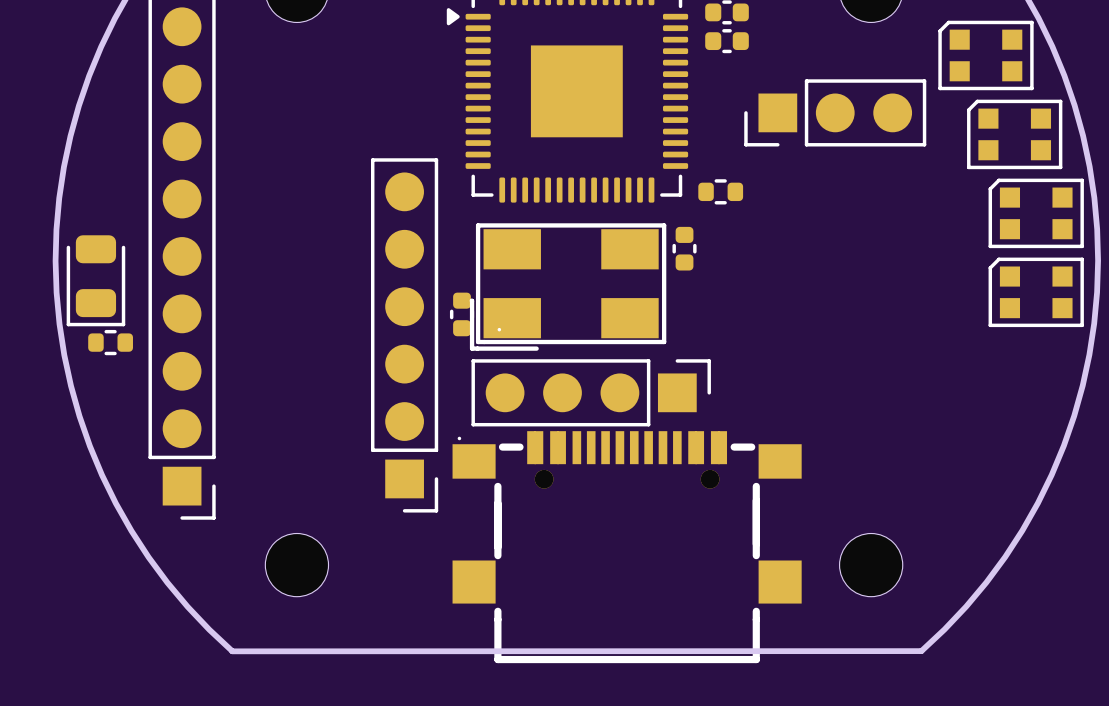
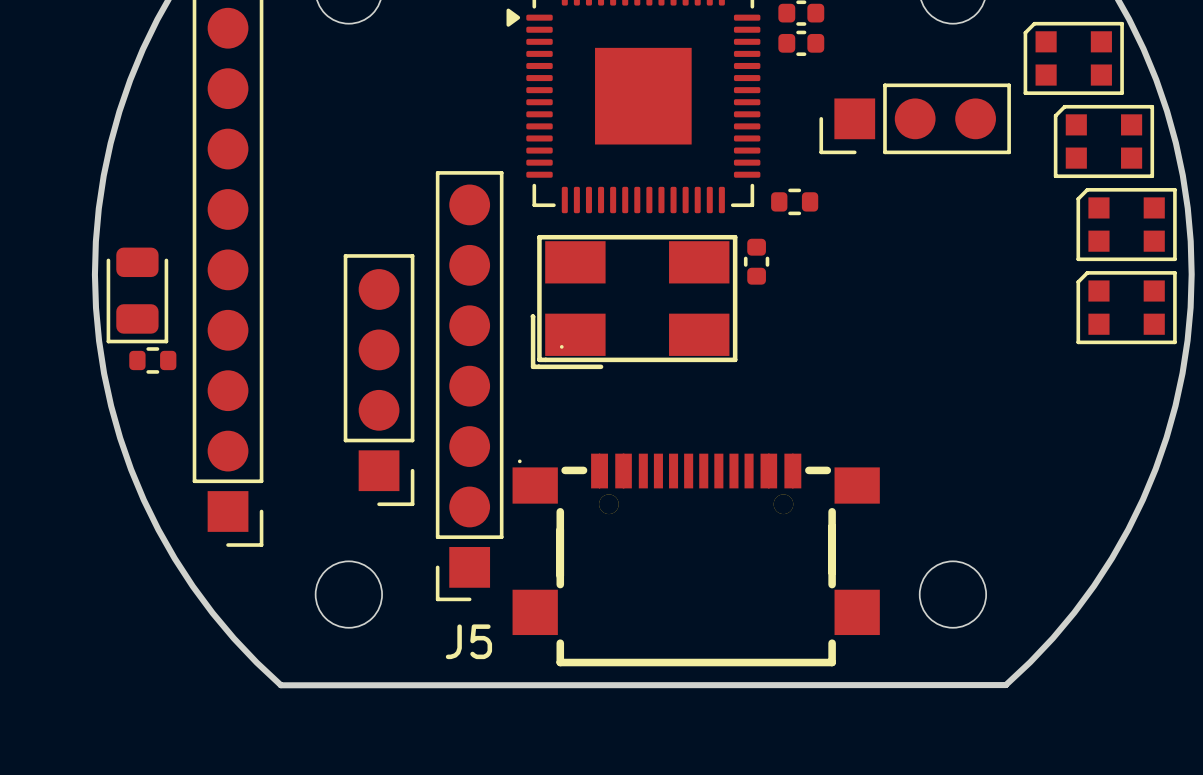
part: (462, 314) -> none
part: (404, 335) -> none
J5: none -> (469, 386)
part rotation: 0° (591, 392) -> 90° clockwise (379, 380)
part position: (591, 392) -> (379, 380)
part footprint: [452, 431, 802, 664] -> [512, 453, 880, 667]

